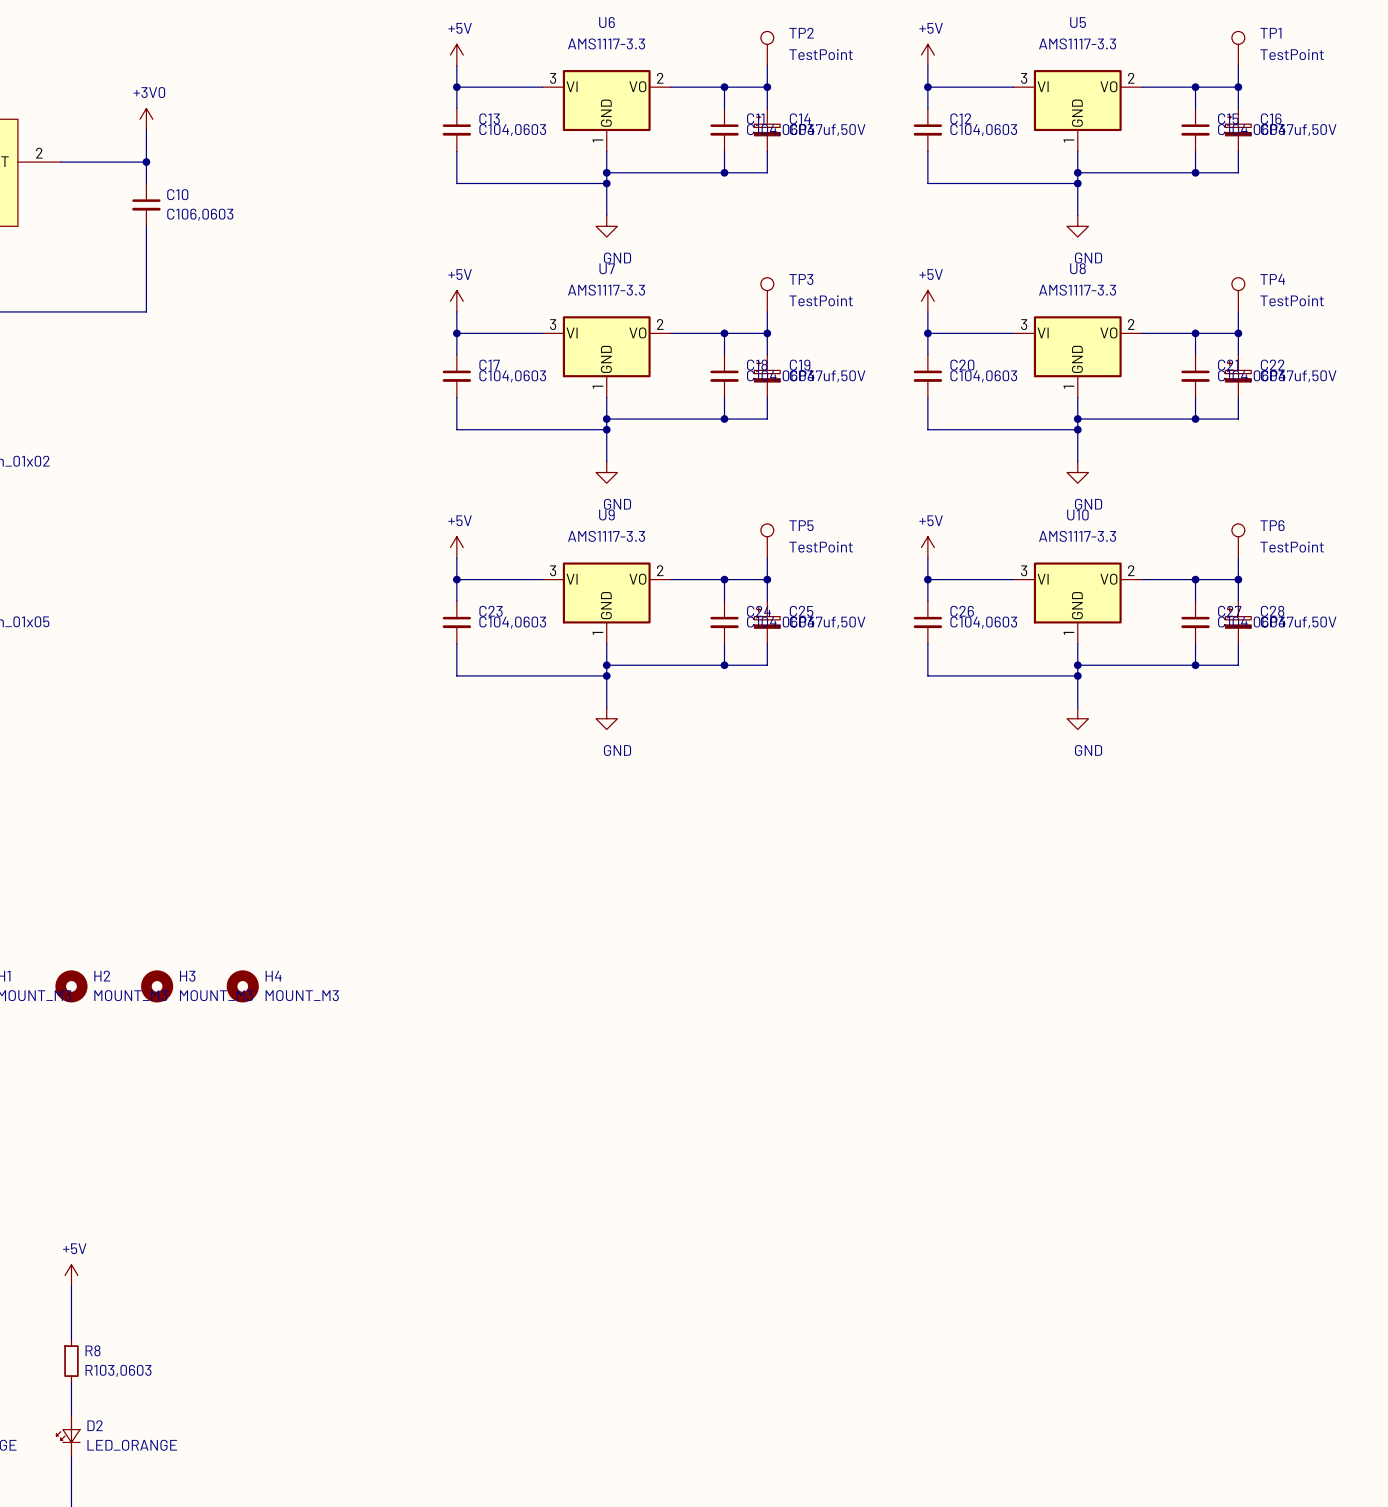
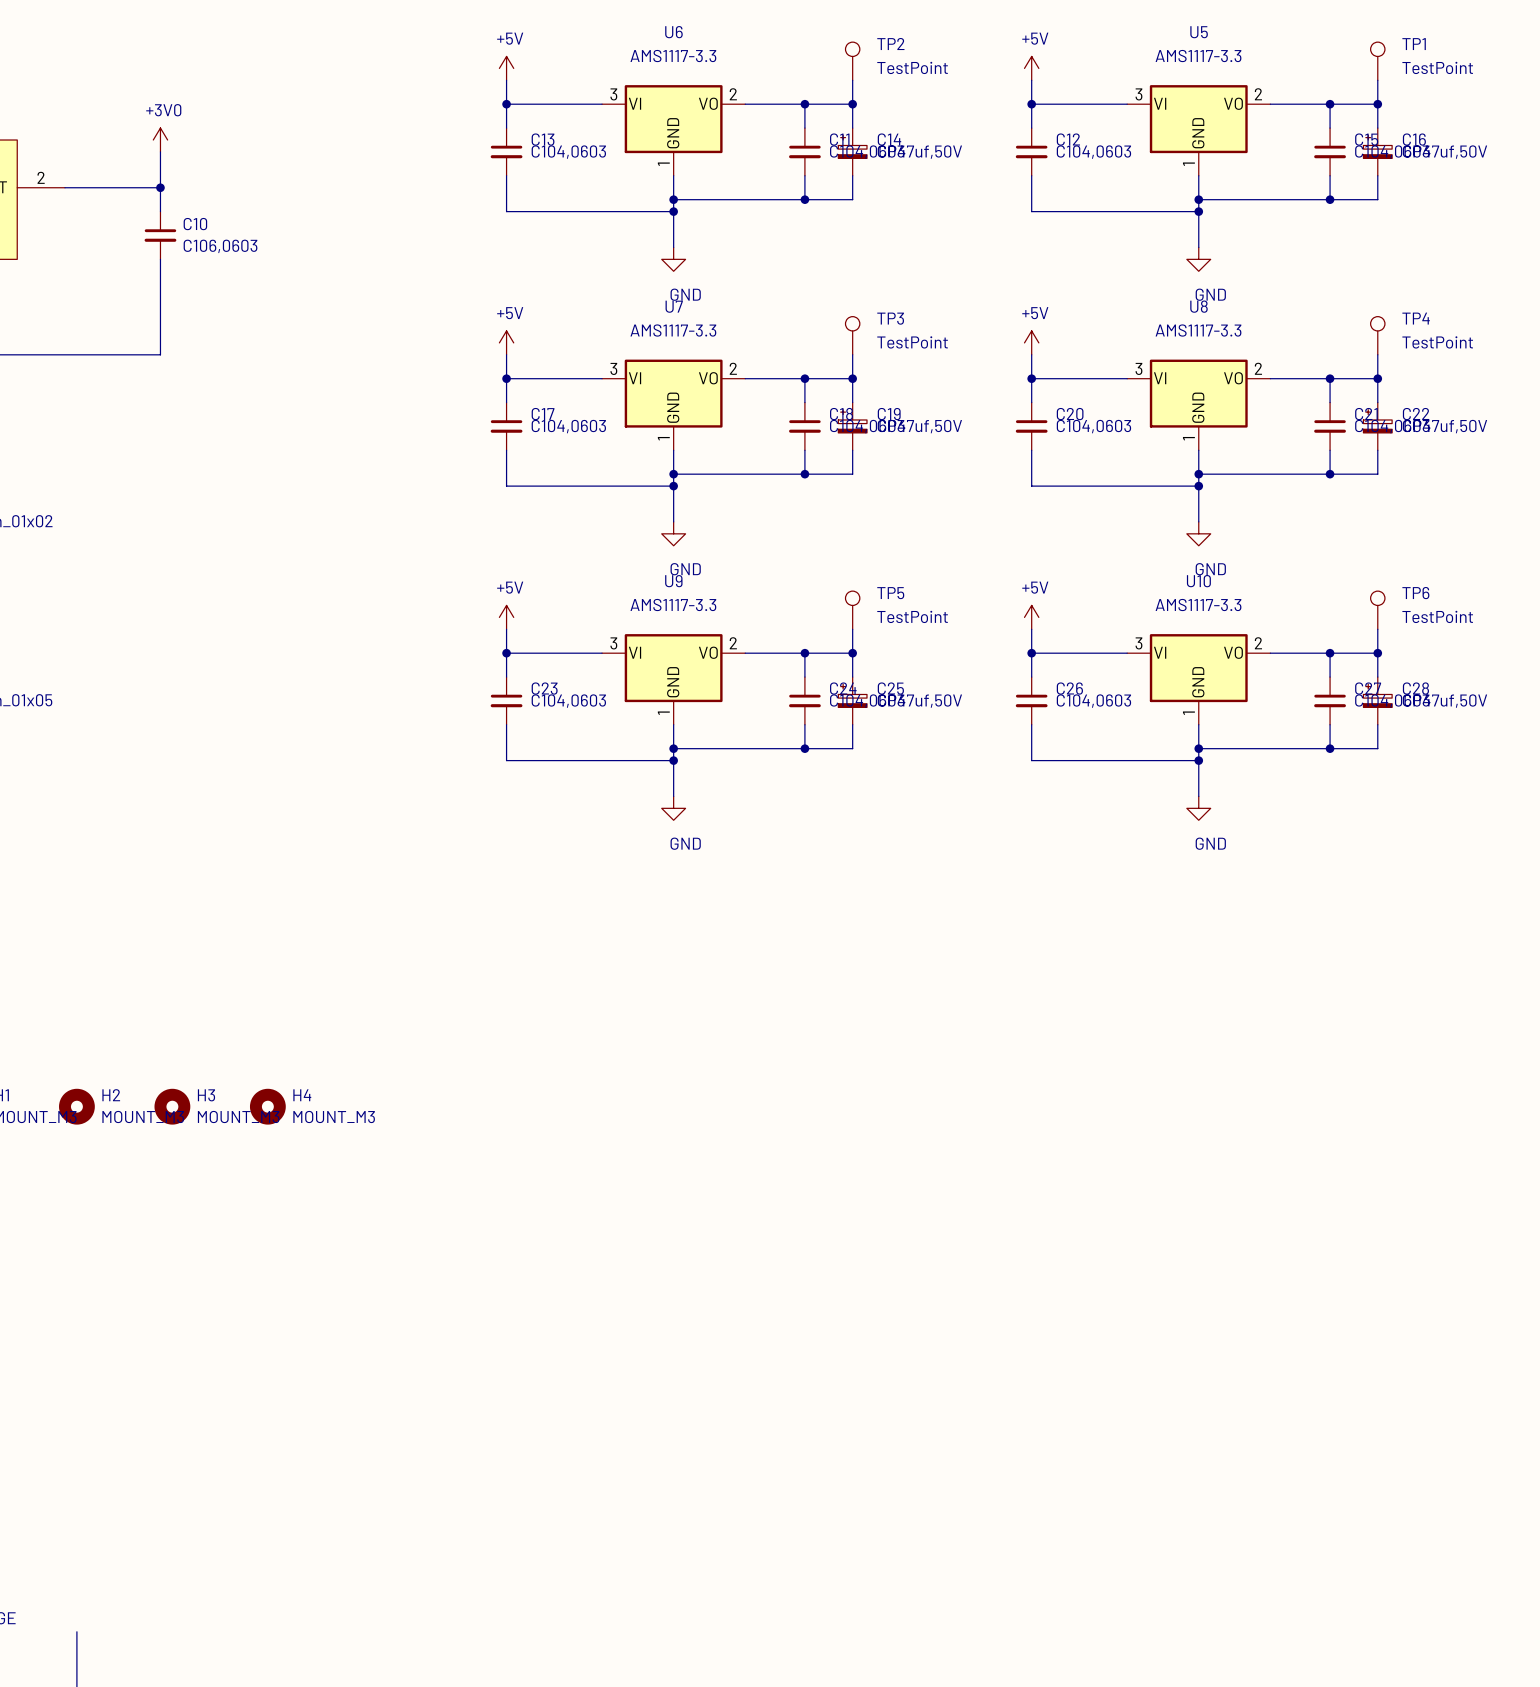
power symbol: +5V (71, 1275) -> none
wire: (71, 1286) (71, 1339) -> none
R8: R103,0603 (71, 1361) -> none
wire: (71, 1382) (71, 1414) -> none
D2: LED_ORANGE (68, 1436) -> none

